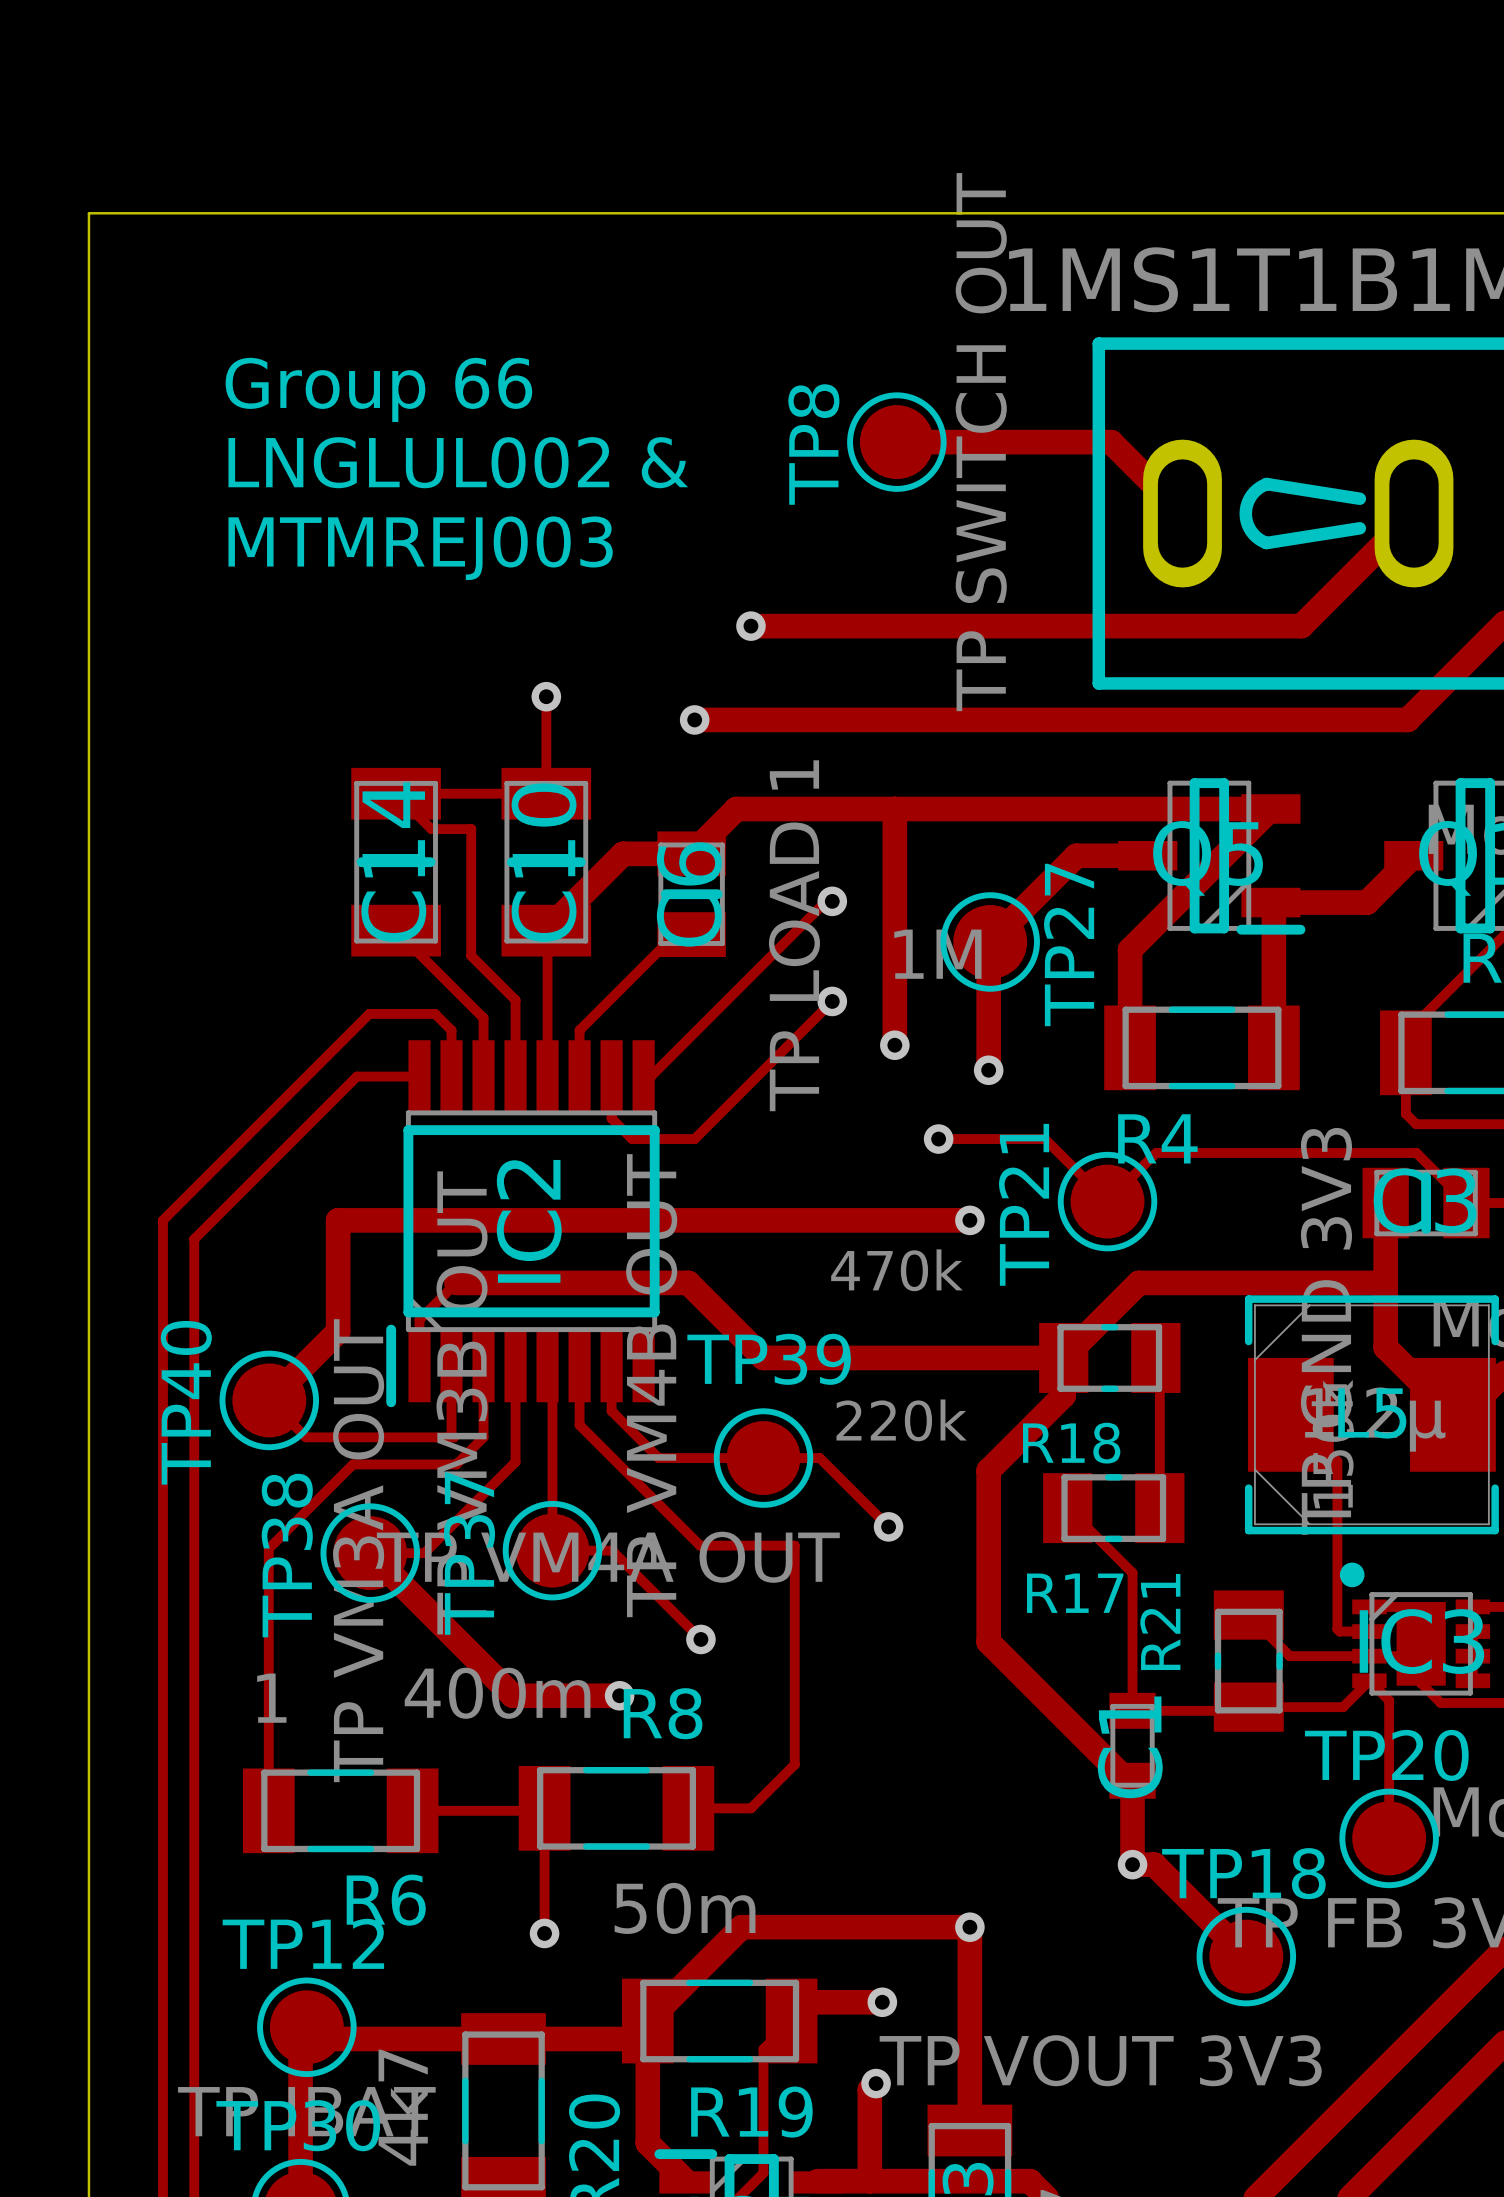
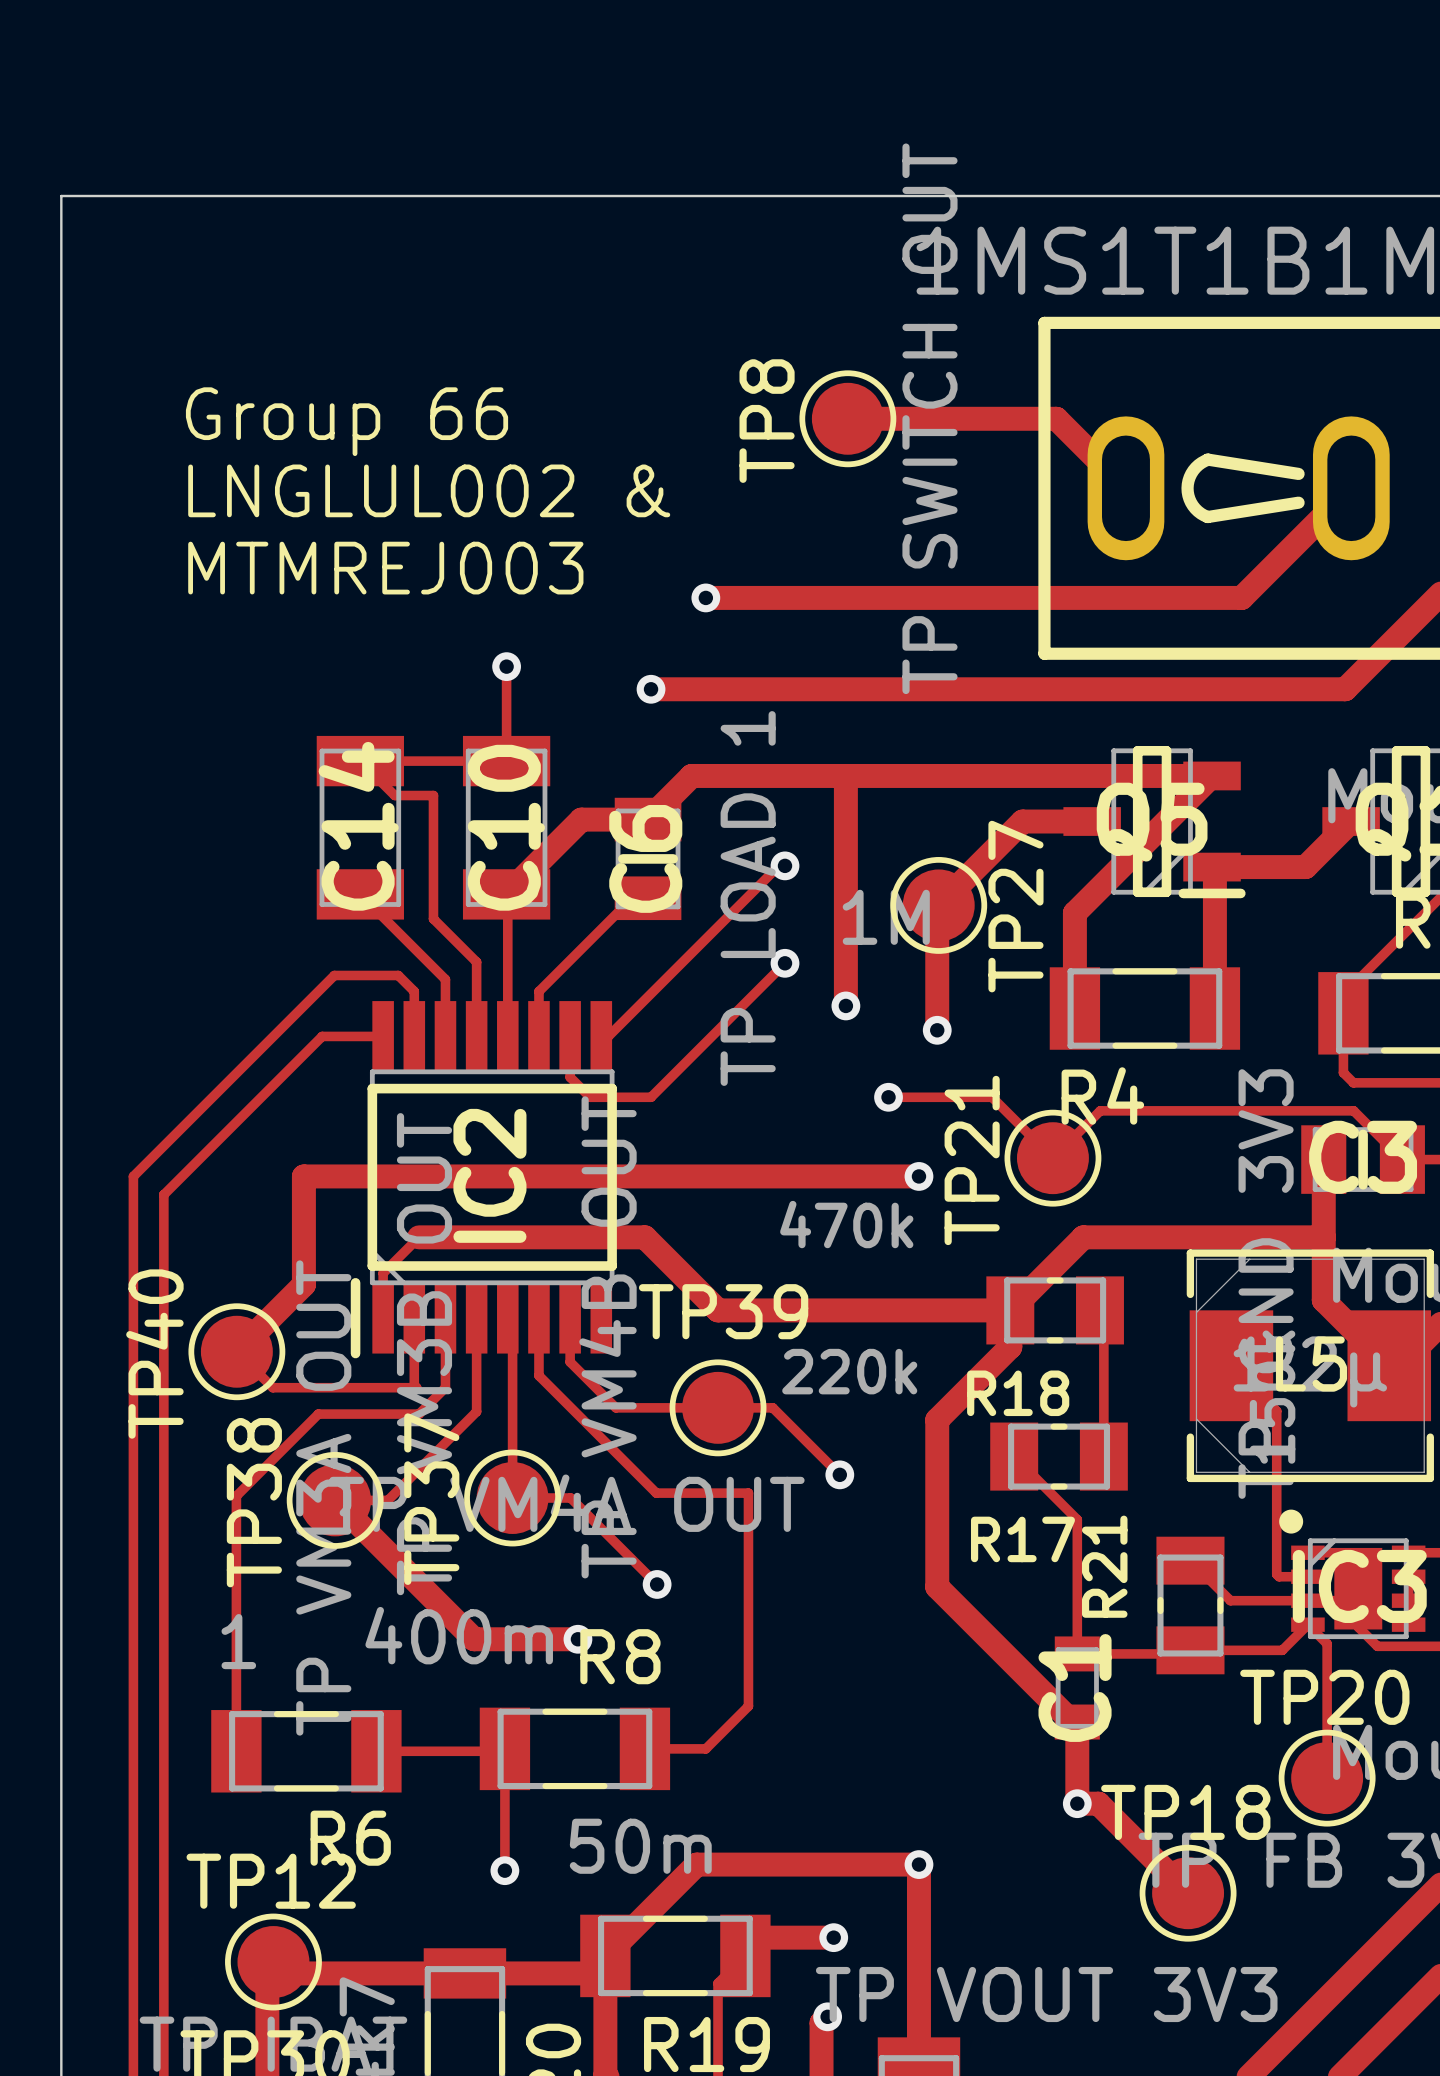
text position: Group 66 (378, 389) -> Group 66 (347, 421)
text position: LNGLUL002 & (458, 462) -> LNGLUL002 & (429, 490)
text position: MTMREJ003 (420, 548) -> MTMREJ003 (385, 568)

